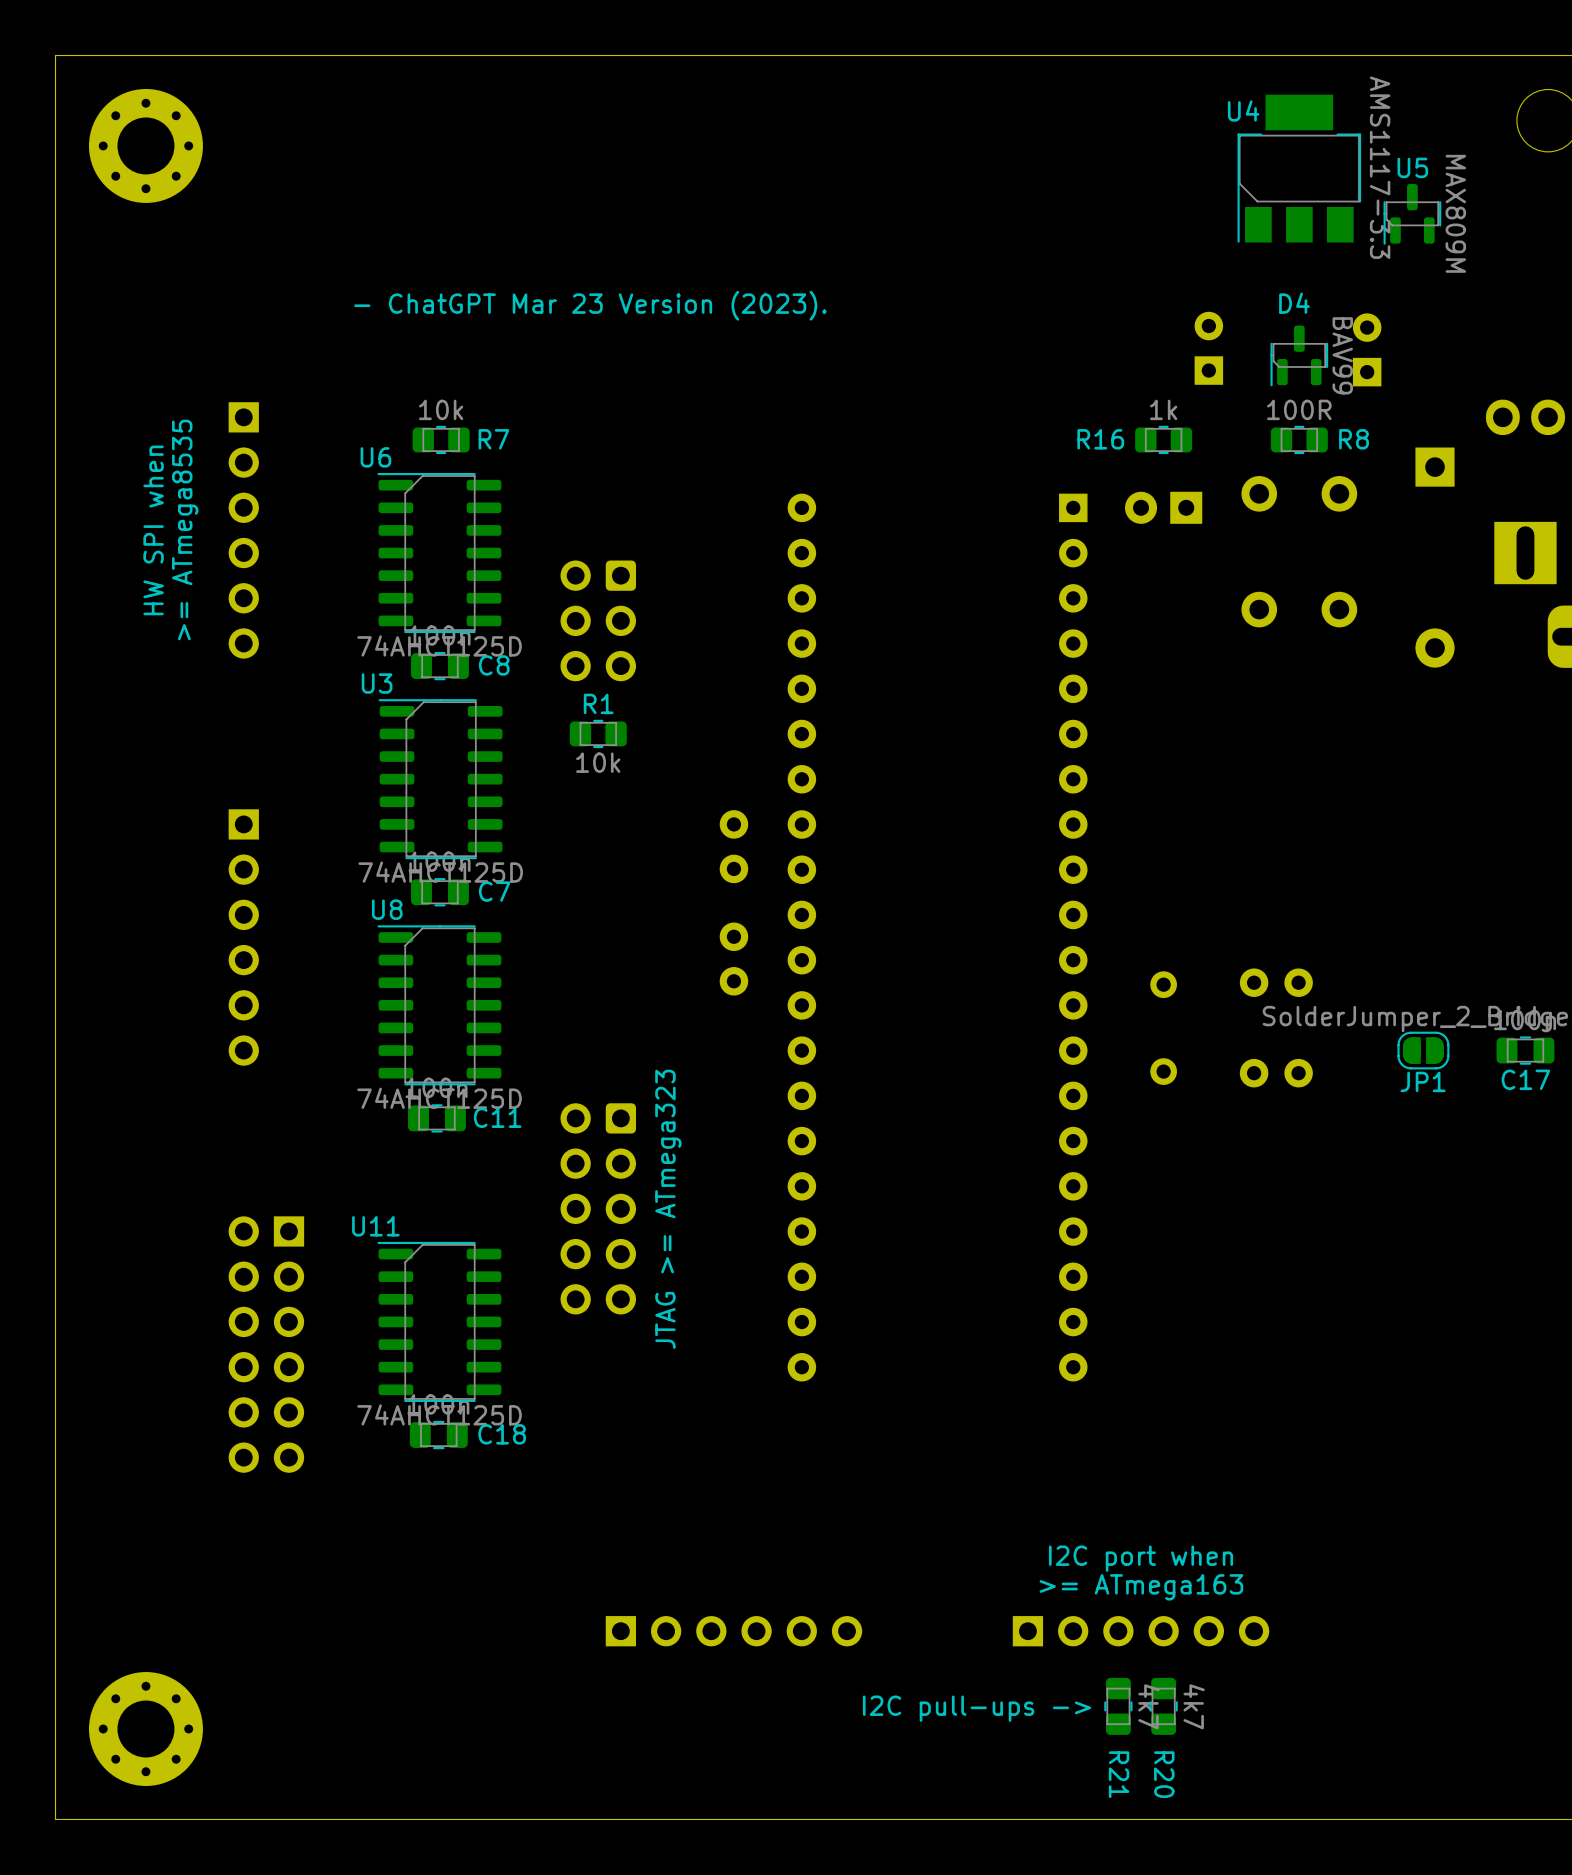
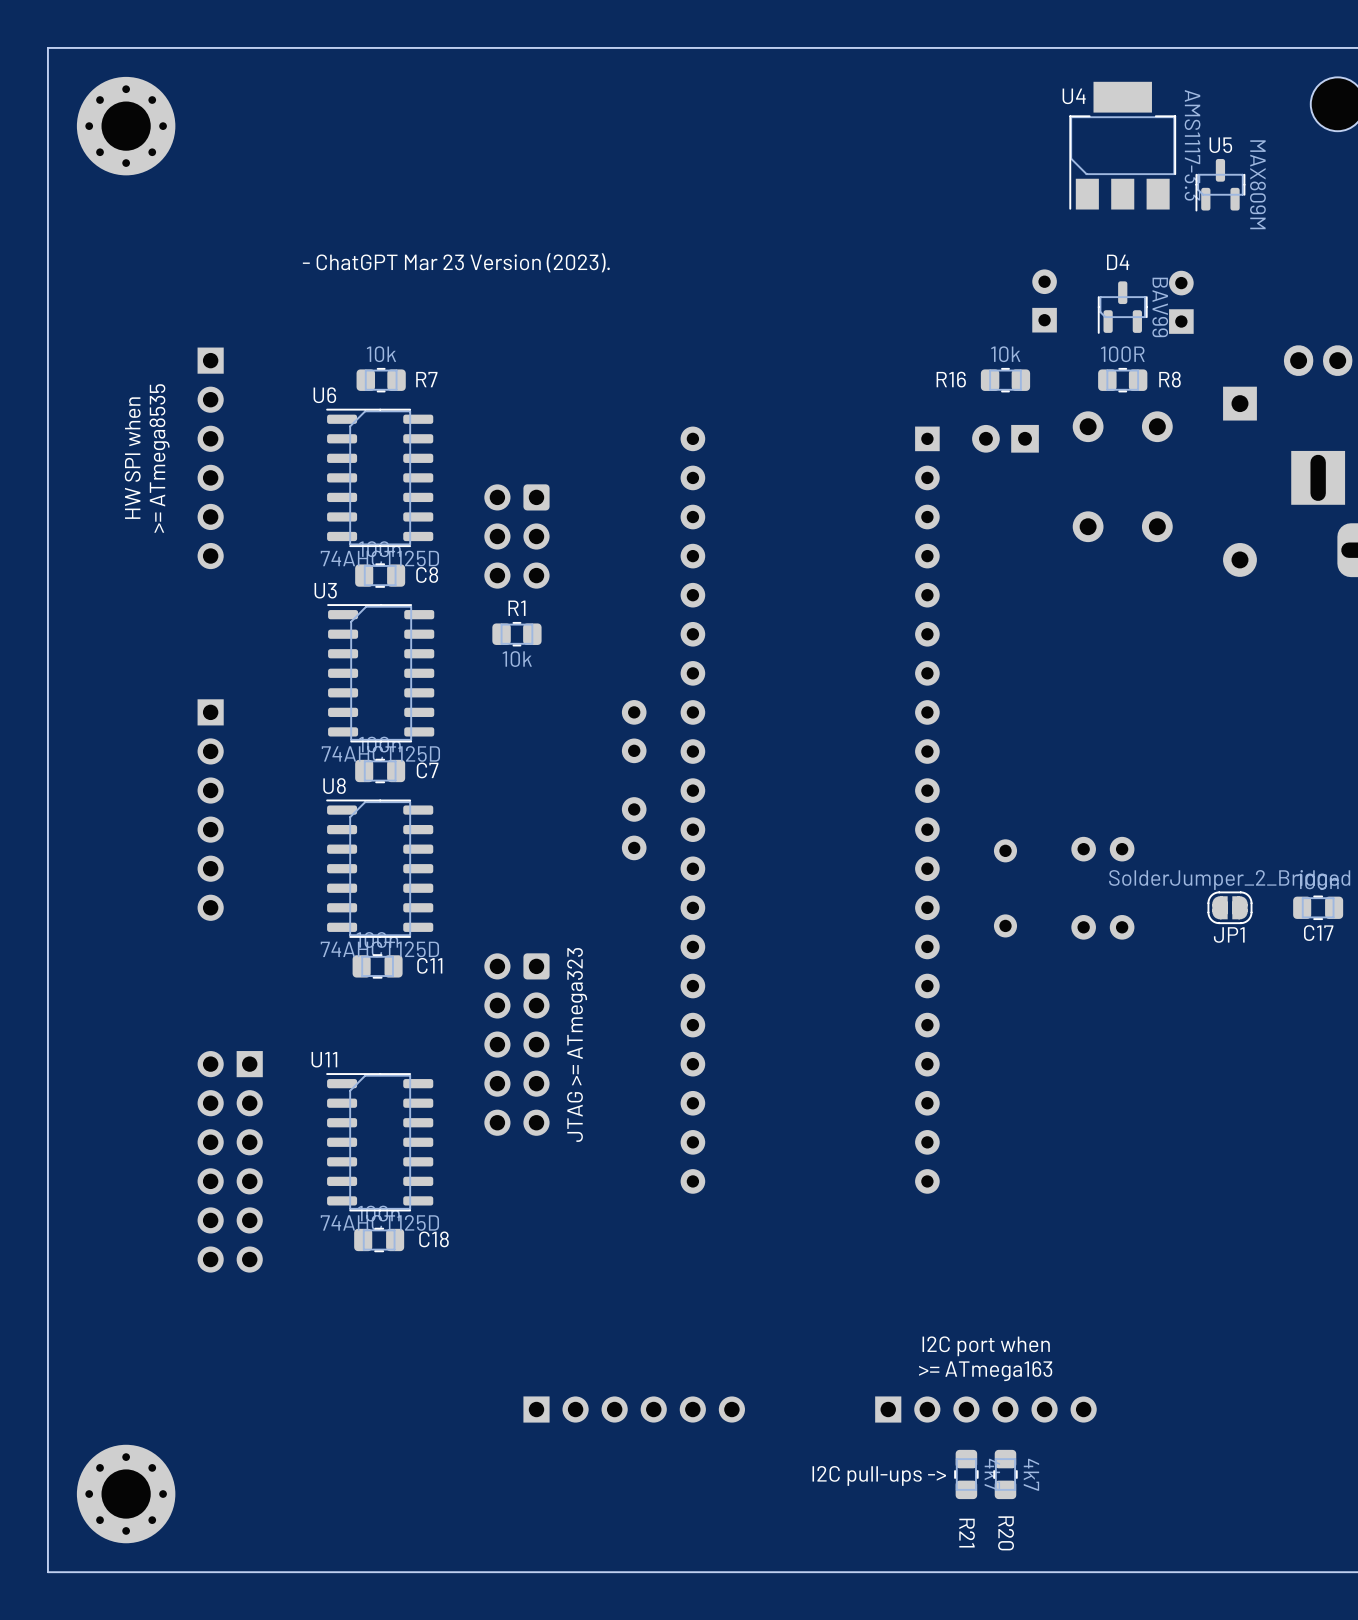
R16 value: 1k (1163, 409) -> 10k (1005, 354)

